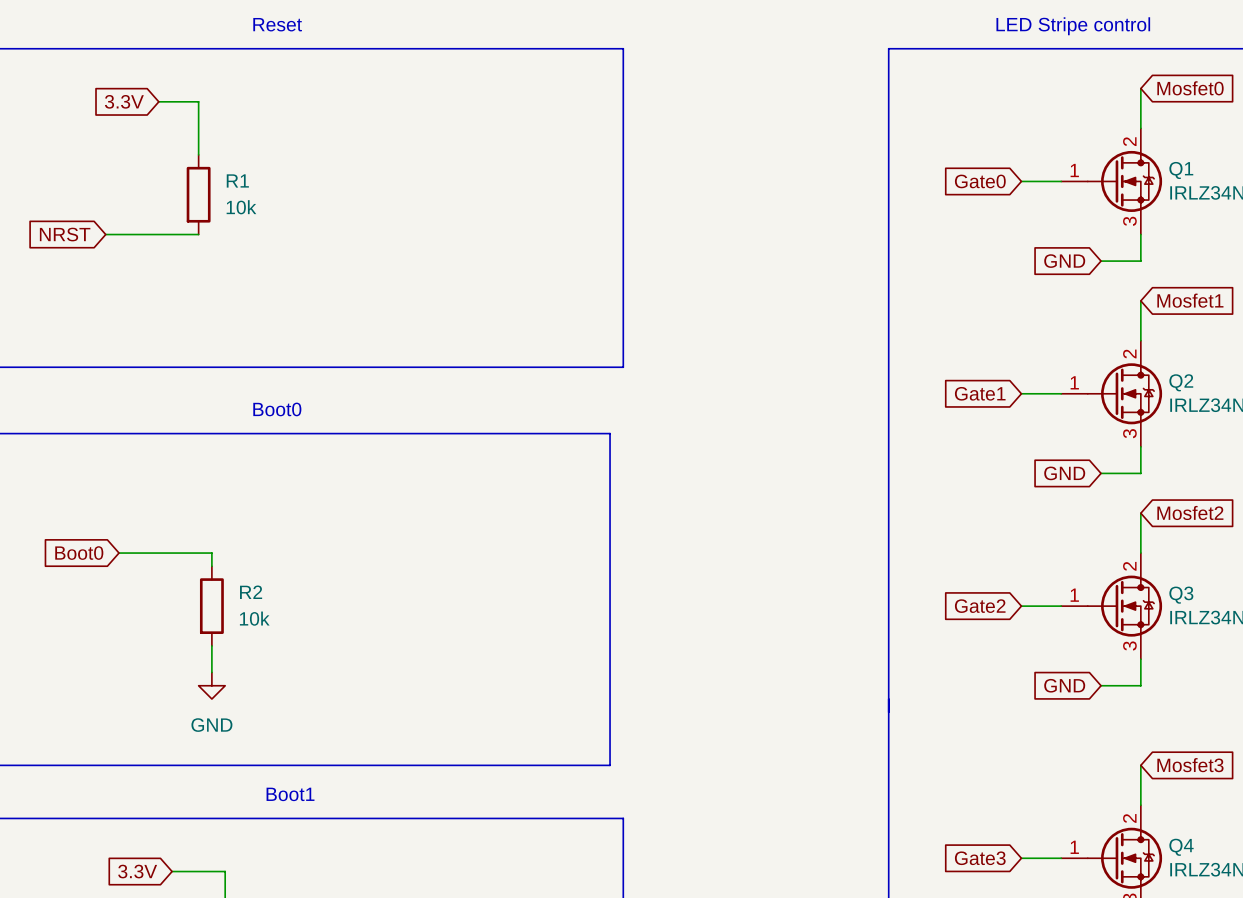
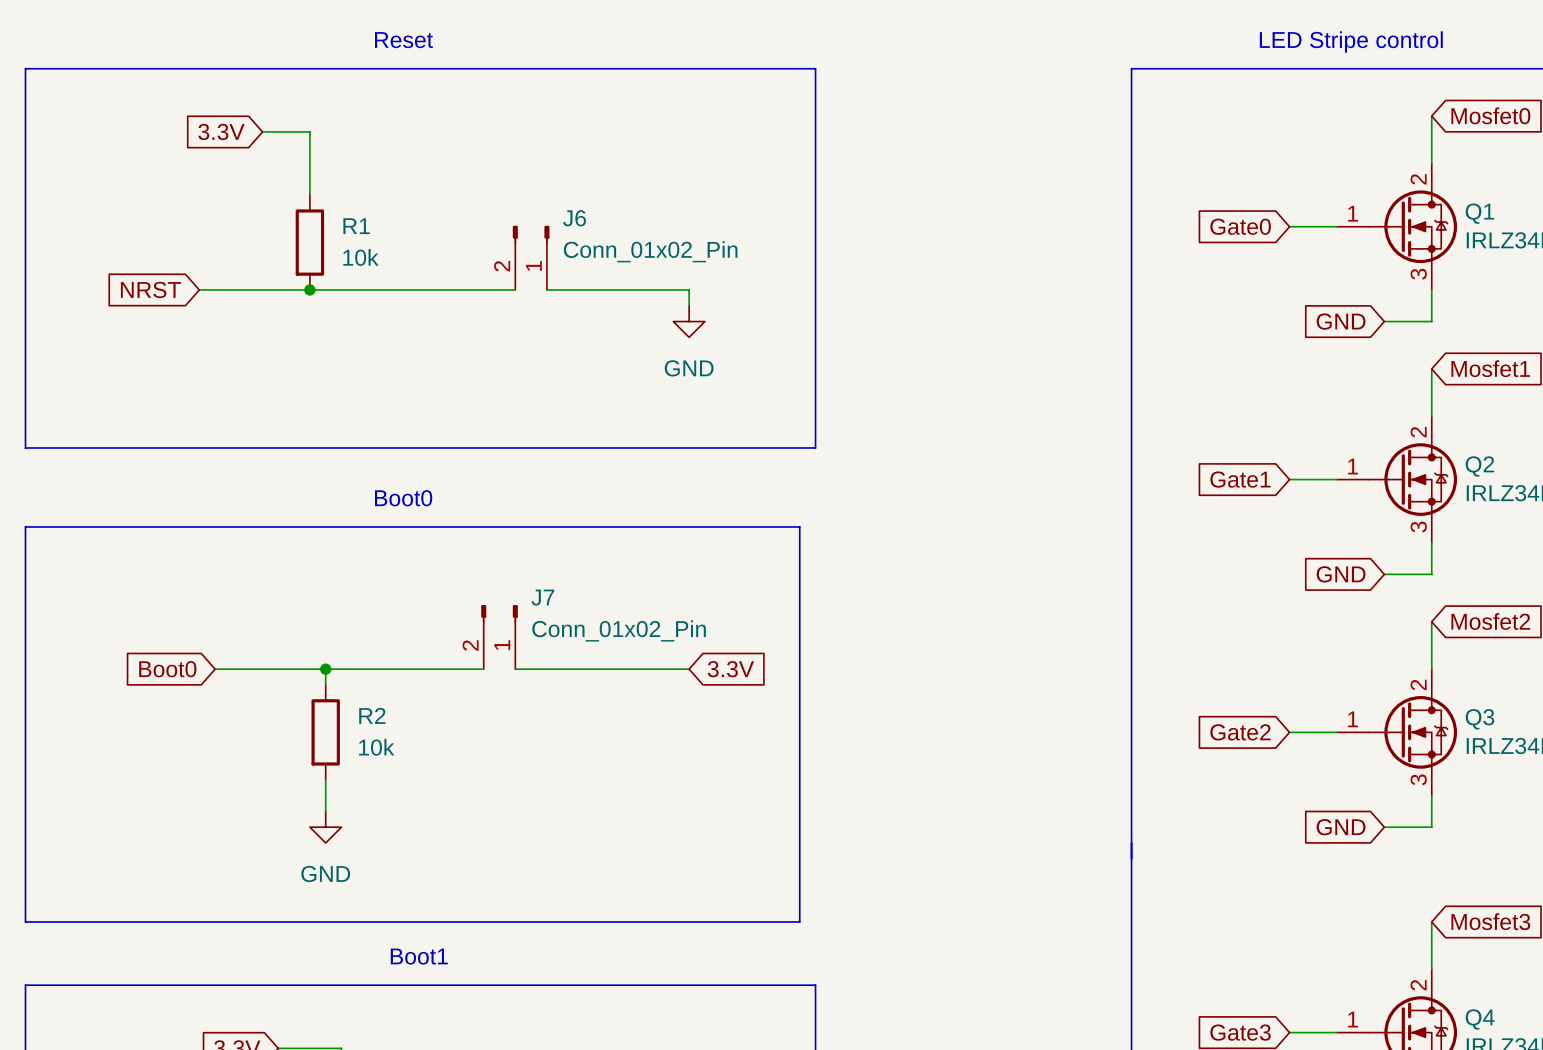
J6: none -> Conn_01x02_Pin (531, 257)
wire: none -> (309, 289) (515, 289)
junction: none -> (309, 289)
wire: none -> (546, 289) (689, 289) (689, 305)
power symbol: none -> GND (689, 321)
J7: none -> Conn_01x02_Pin (499, 637)
wire: none -> (325, 669) (483, 669)
junction: none -> (325, 669)
wire: none -> (515, 669) (689, 669)
global label: none -> 3.3V (730, 669)

